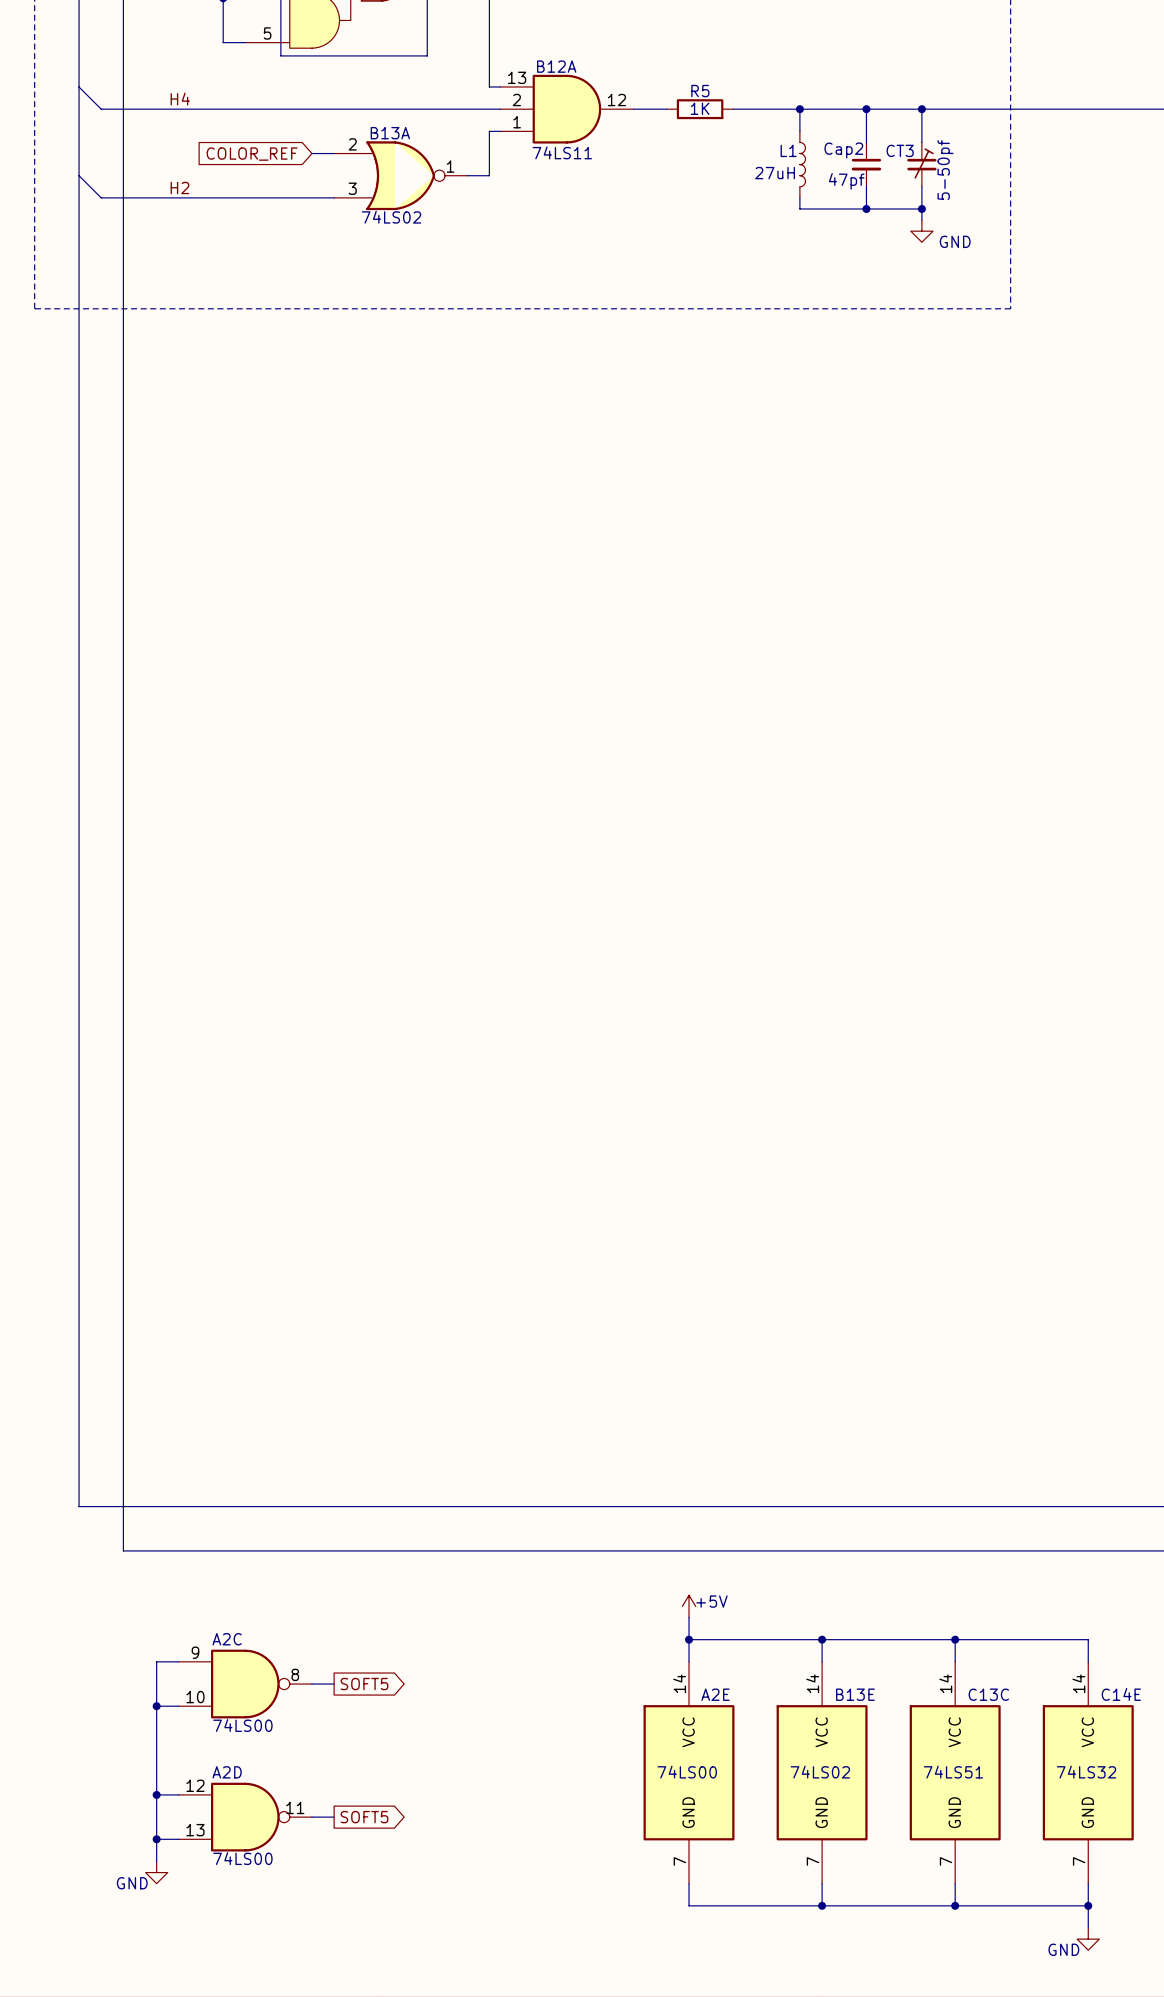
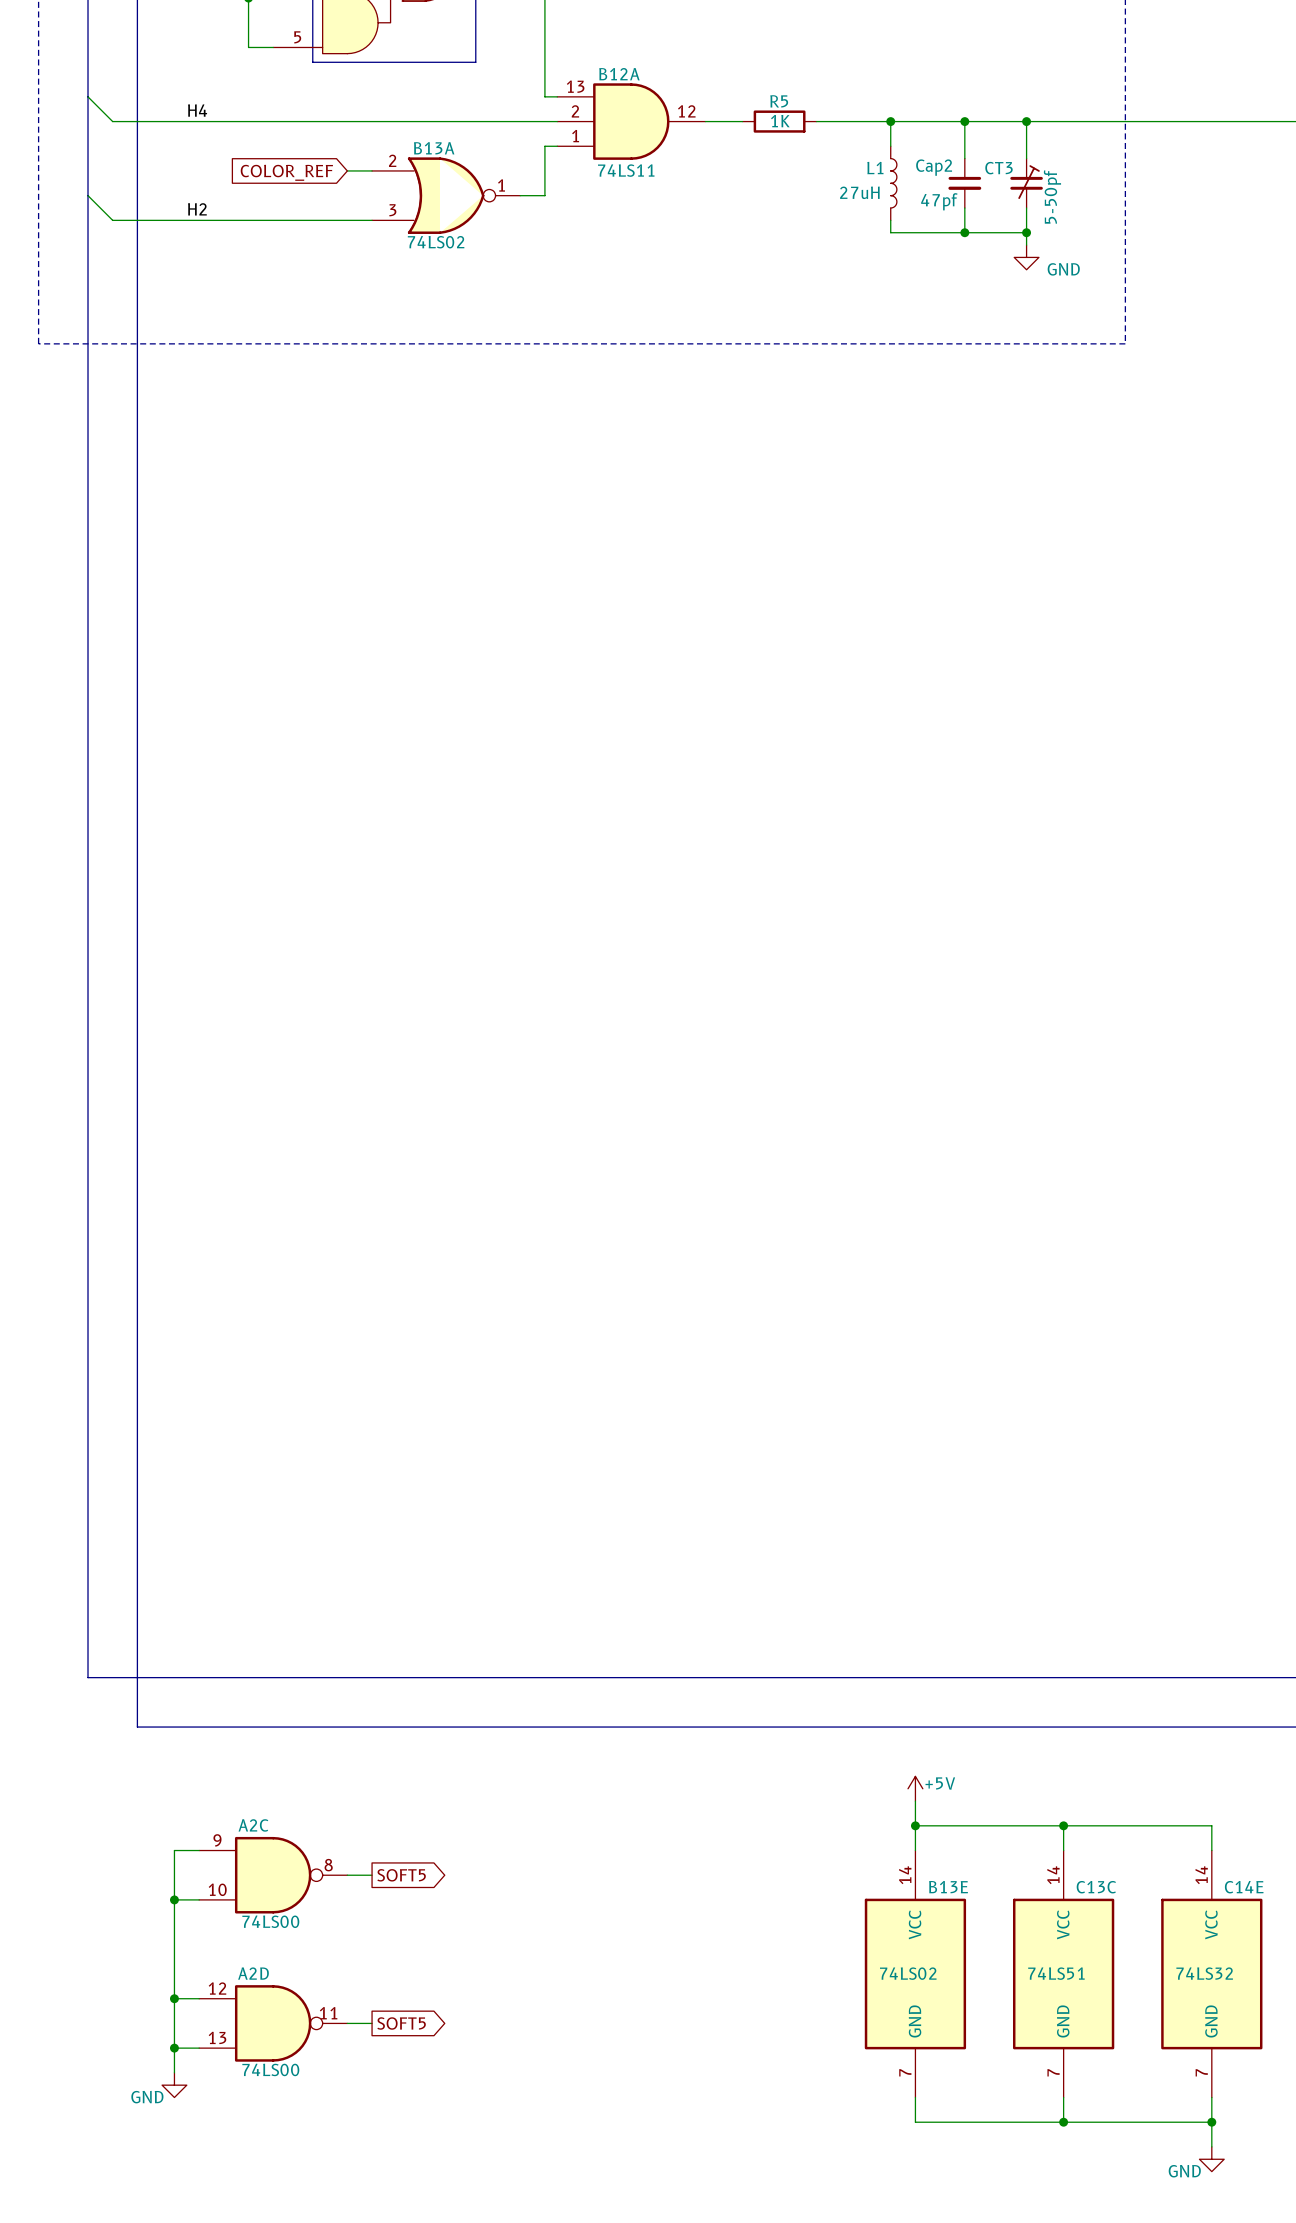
power symbol position: +5V (689, 1606) -> +5V (915, 1788)
wire: (689, 1617) (689, 1661) -> none
wire: (689, 1639) (822, 1639) -> (915, 1801) (915, 1825)
junction: (689, 1639) -> none
A2E: 74LS00 (689, 1772) -> none
wire: (689, 1883) (689, 1905) (822, 1905) -> none
junction: (822, 1905) -> none

